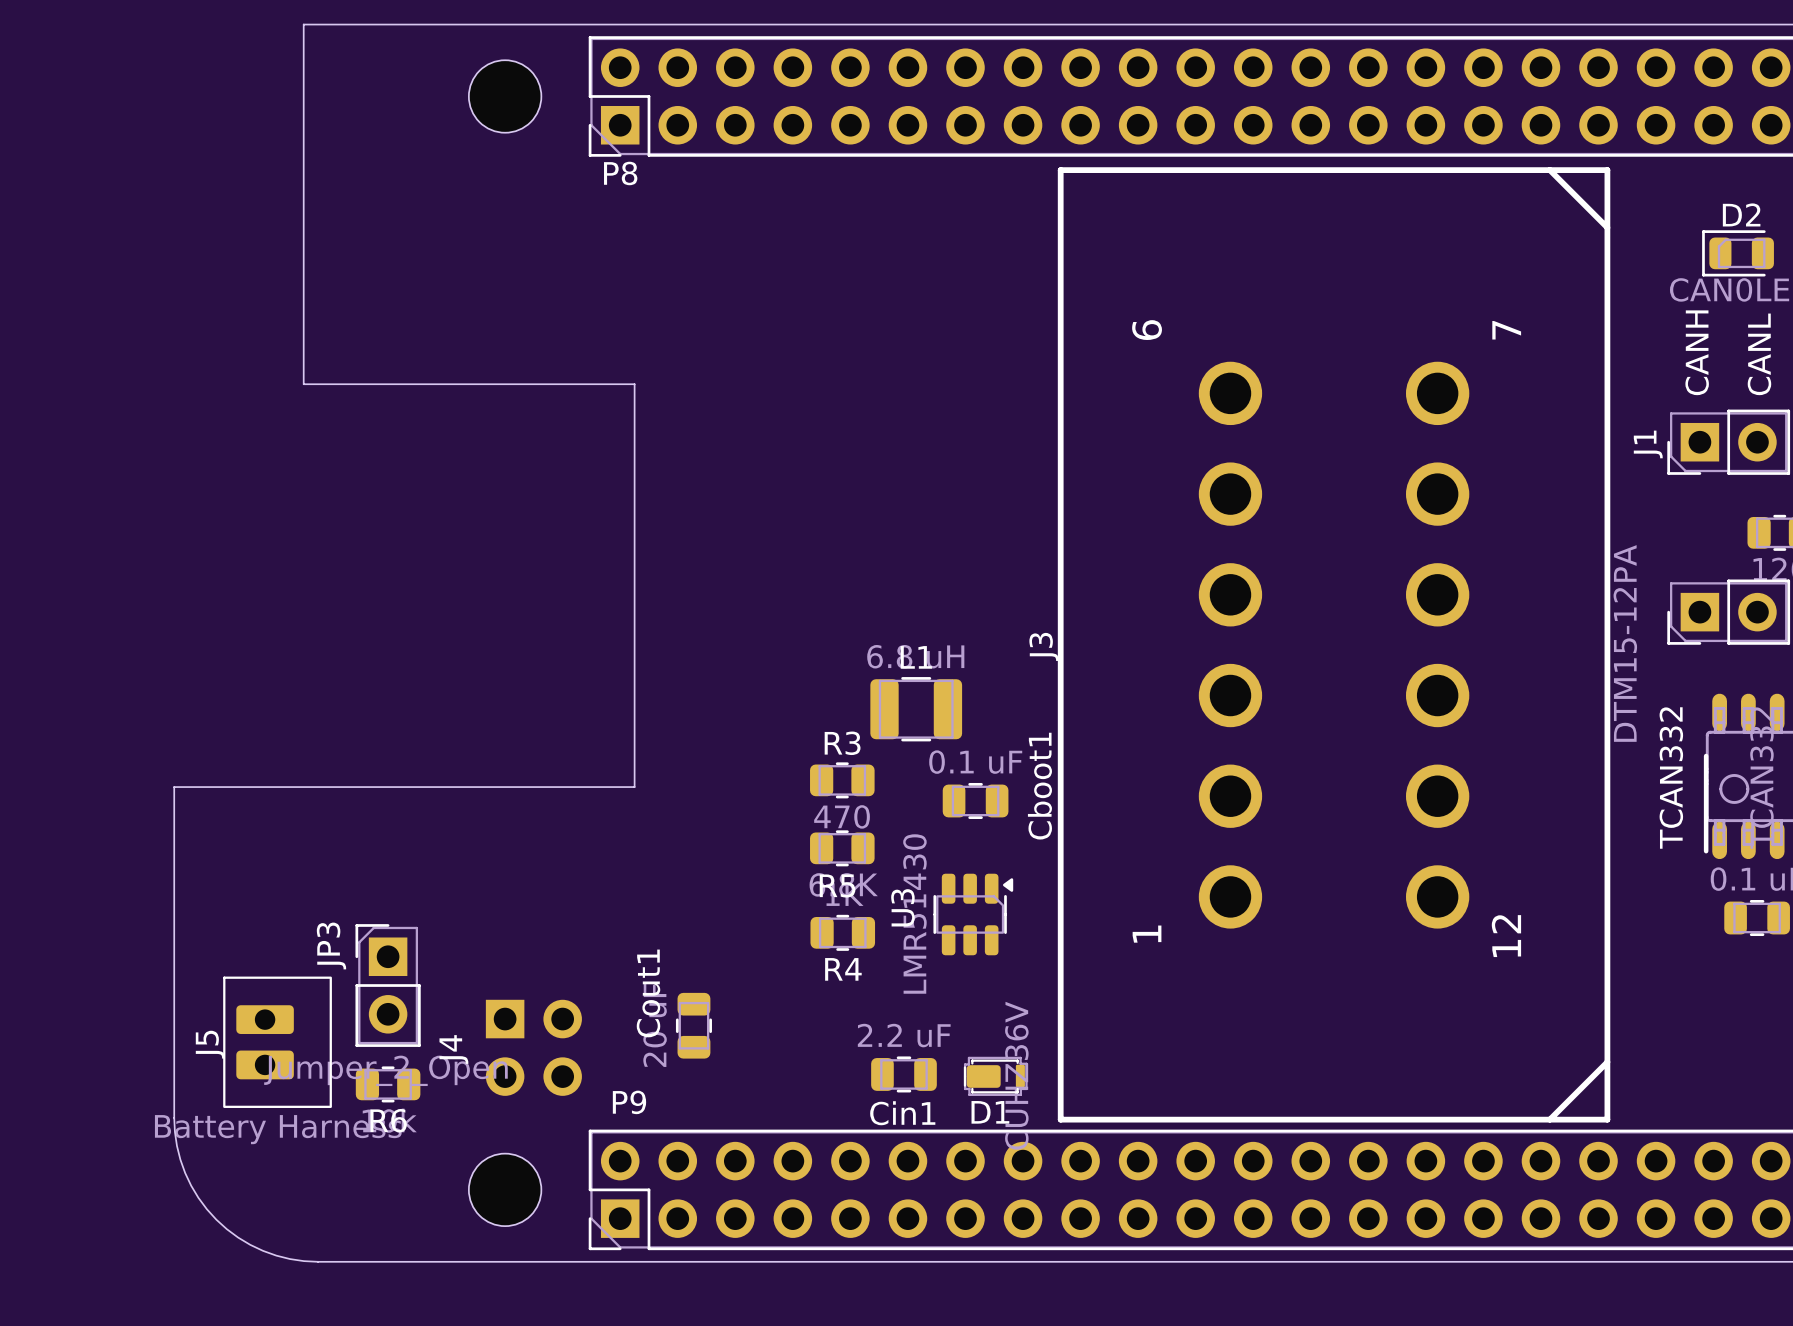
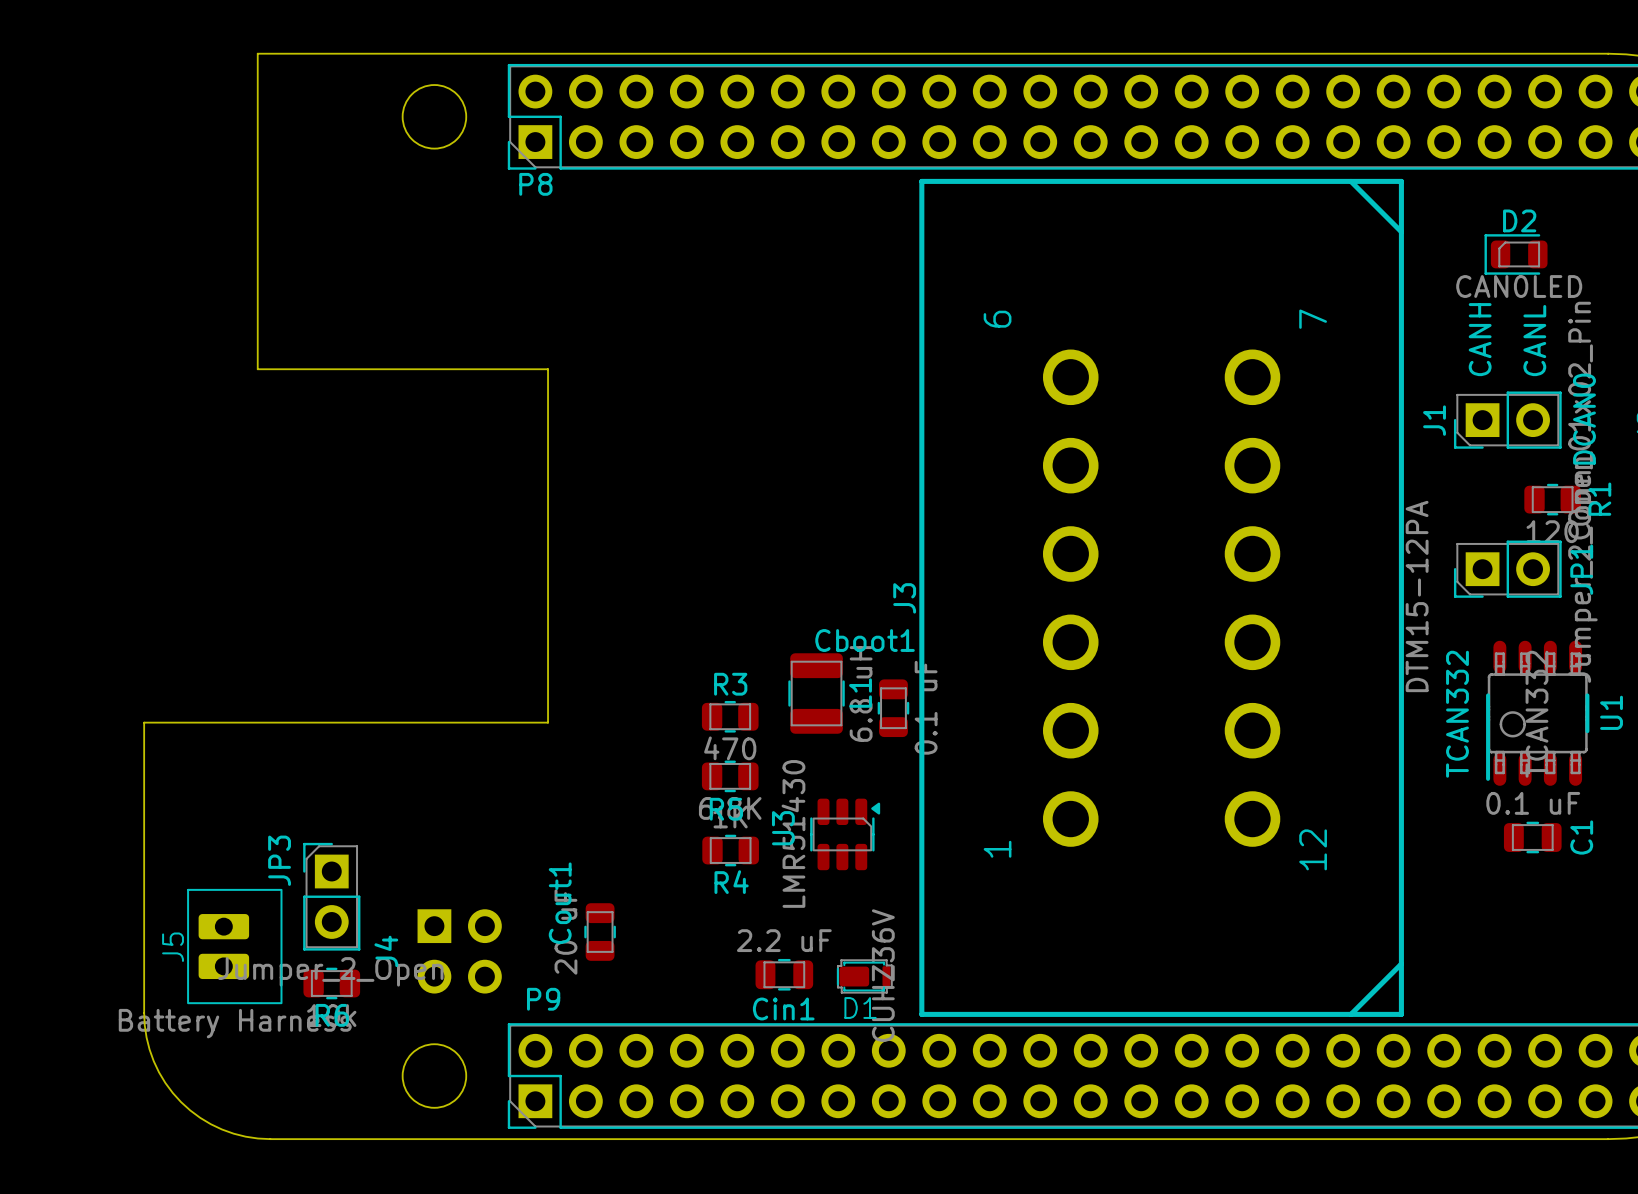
L1 rotation: 0° (916, 709) -> 90° clockwise (816, 693)
Cboot1 name position: Cboot1 (1039, 786) -> Cboot1 (865, 640)
Cboot1 rotation: 0° (975, 800) -> 90° clockwise (893, 708)
Cboot1 position: (975, 800) -> (893, 708)

